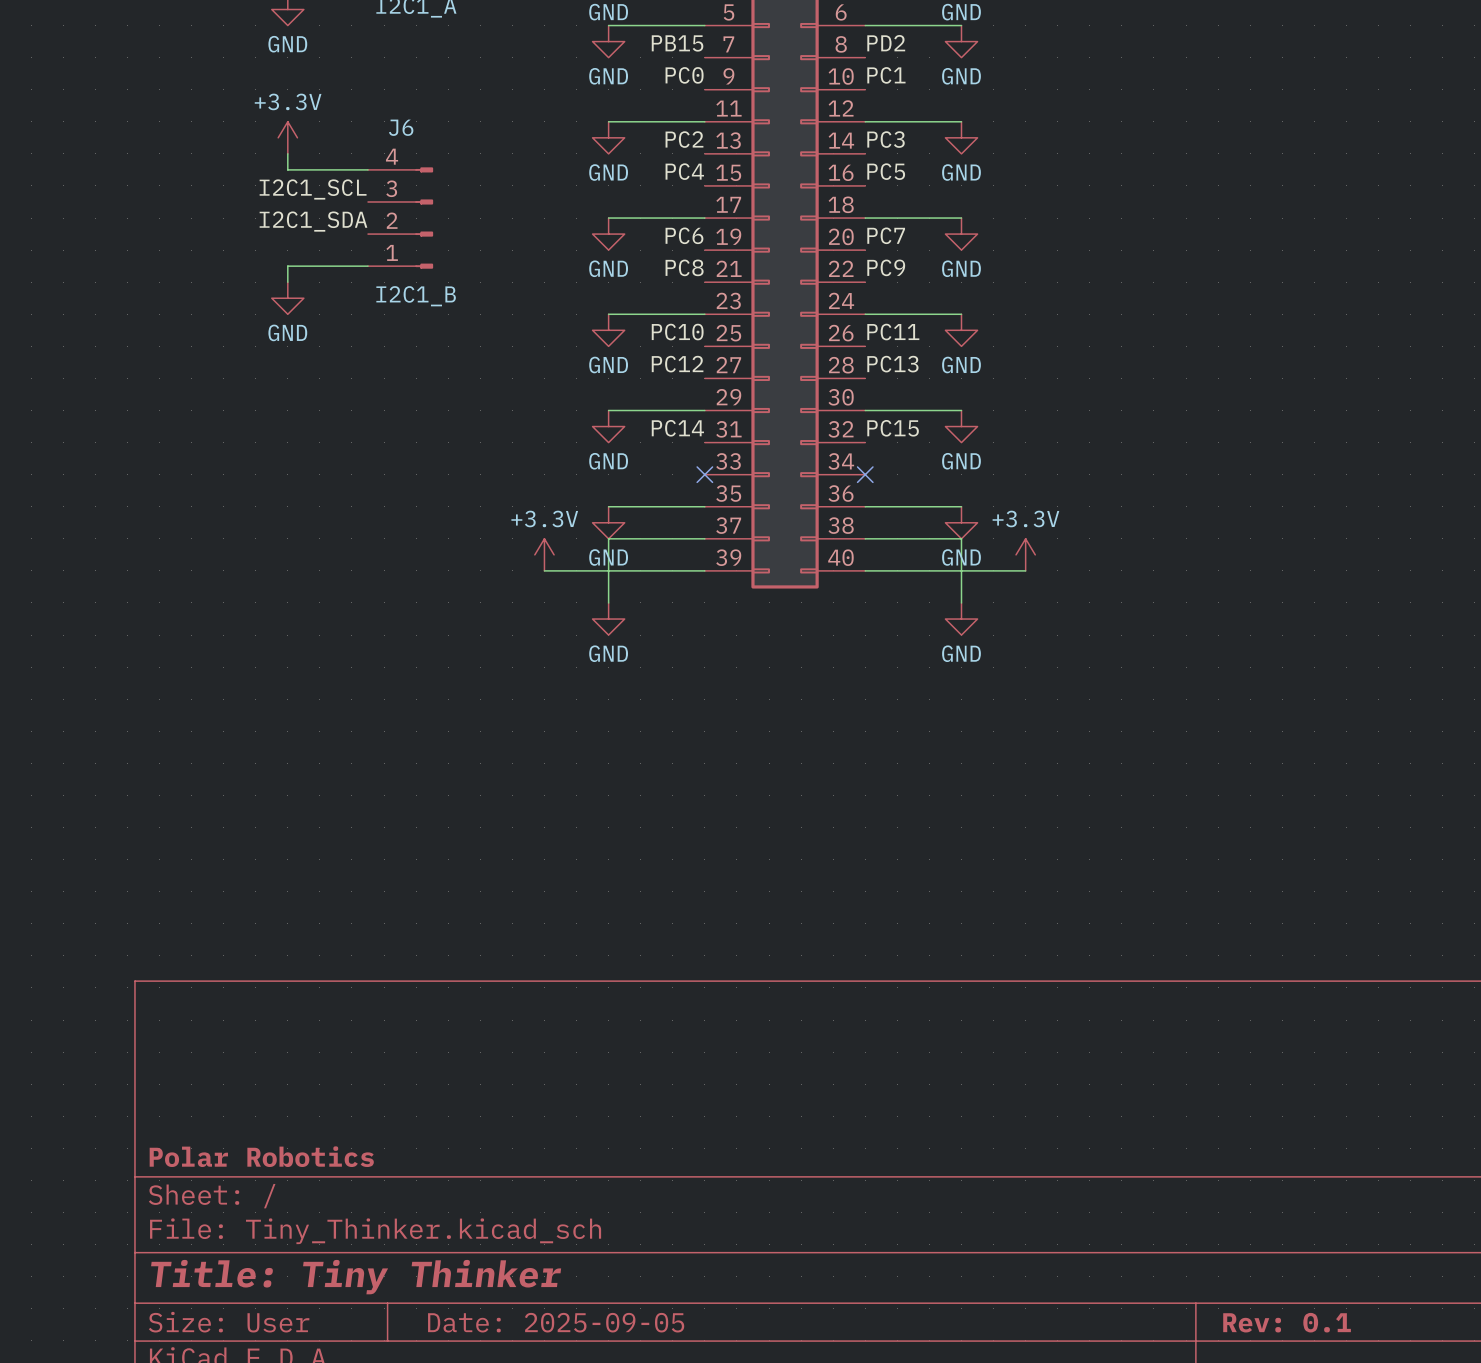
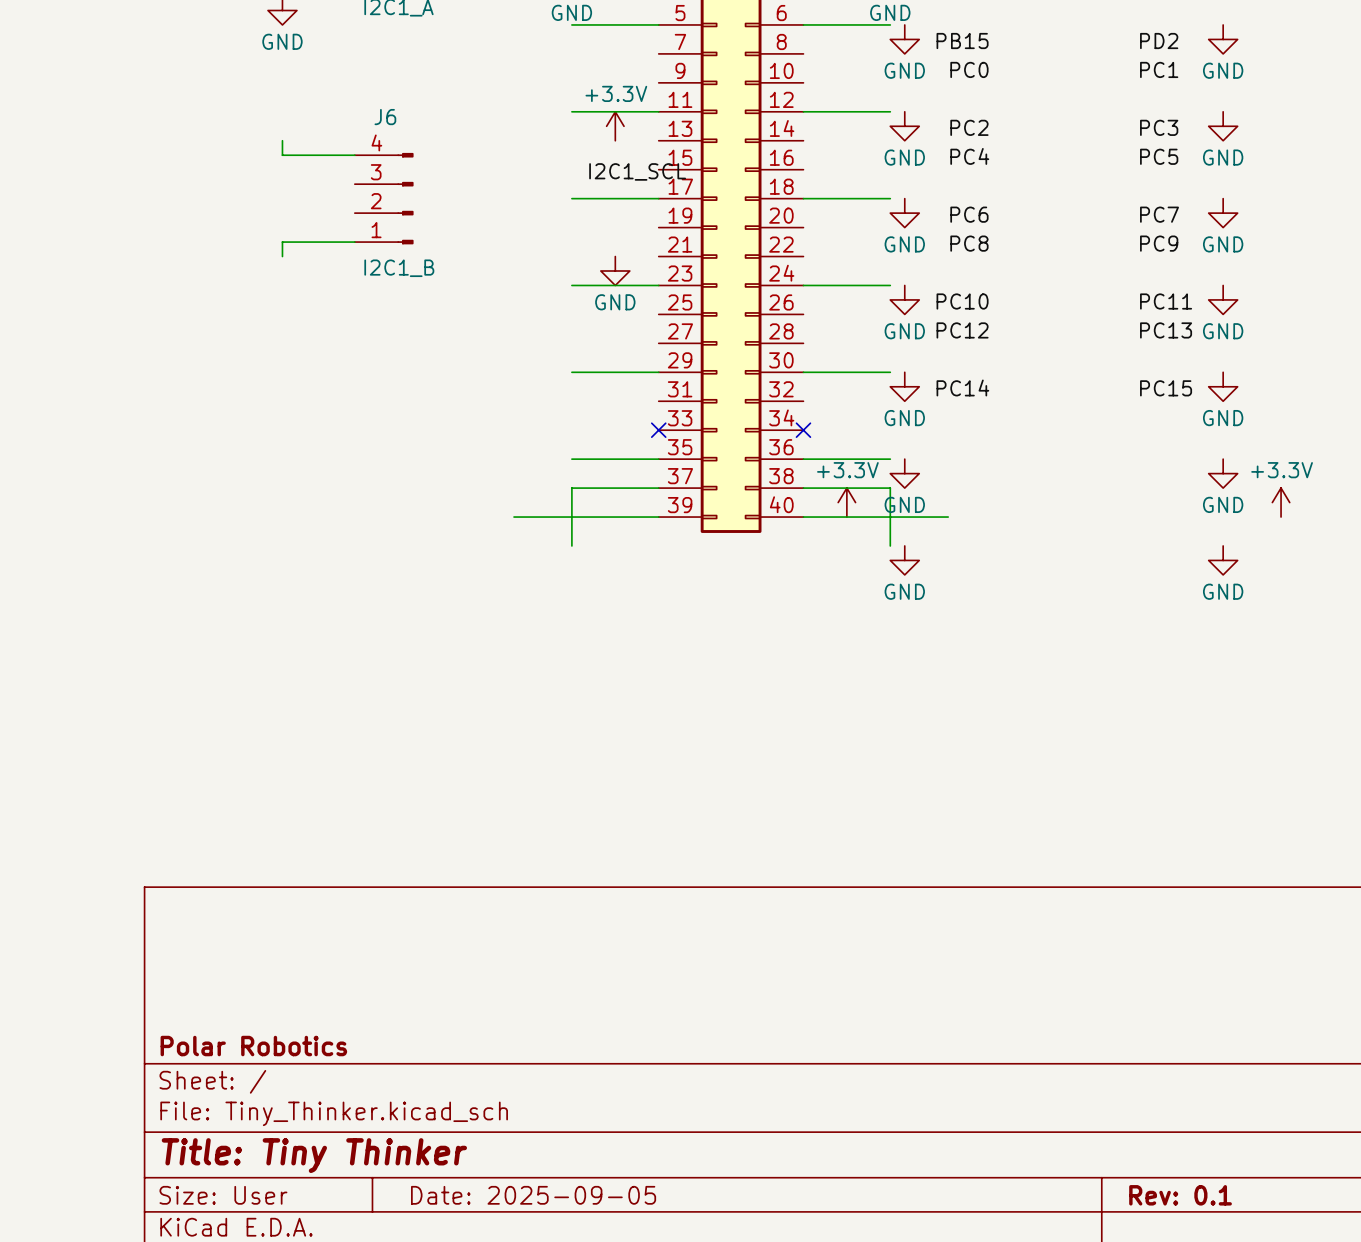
power symbol: GND (608, 41) -> none
power symbol position: GND (961, 41) -> GND (904, 39)
power symbol: none -> GND (1223, 39)
label: PB15 (677, 43) -> none
label: PD2 (886, 43) -> none
label: none -> PB15 (962, 41)
label: none -> PD2 (1159, 41)
label: PC0 (684, 75) -> none
label: PC1 (886, 75) -> none
label: none -> PC0 (969, 69)
label: none -> PC1 (1159, 69)
power symbol: +3.3V (287, 137) -> none
power symbol: GND (608, 137) -> none
power symbol: none -> +3.3V (615, 126)
power symbol position: GND (961, 137) -> GND (904, 126)
power symbol: none -> GND (1223, 126)
label: PC2 (684, 139) -> none
label: PC3 (886, 139) -> none
label: none -> PC2 (969, 127)
label: none -> PC3 (1159, 127)
label: PC4 (684, 171) -> none
label: PC5 (886, 171) -> none
label: none -> PC4 (969, 156)
label: none -> PC5 (1159, 156)
label: I2C1_SCL (313, 189) -> none
label: none -> I2C1_SCL (637, 171)
label: I2C1_SDA (313, 221) -> none
power symbol: GND (608, 234) -> none
power symbol position: GND (961, 234) -> GND (904, 213)
power symbol: none -> GND (1223, 213)
label: PC6 (684, 235) -> none
label: PC7 (886, 235) -> none
label: none -> PC6 (969, 214)
label: none -> PC7 (1159, 214)
label: PC8 (684, 267) -> none
label: PC9 (886, 267) -> none
label: none -> PC8 (969, 243)
label: none -> PC9 (1159, 243)
power symbol: GND (287, 298) -> none
power symbol: none -> GND (615, 271)
power symbol: GND (608, 330) -> none
power symbol position: GND (961, 330) -> GND (904, 299)
power symbol: none -> GND (1223, 299)
label: PC10 (677, 332) -> none
label: PC11 (893, 332) -> none
label: none -> PC10 (962, 301)
label: none -> PC11 (1166, 301)
label: PC12 (677, 364) -> none
label: PC13 (892, 364) -> none
label: none -> PC12 (962, 330)
label: none -> PC13 (1166, 330)
power symbol: GND (608, 426) -> none
power symbol position: GND (961, 426) -> GND (904, 386)
power symbol: none -> GND (1223, 386)
label: PC14 (677, 428) -> none
label: PC15 (893, 428) -> none
label: none -> PC14 (962, 387)
label: none -> PC15 (1166, 388)
power symbol: GND (608, 522) -> none
power symbol position: GND (961, 522) -> GND (904, 473)
power symbol: none -> GND (1223, 473)
power symbol: +3.3V (544, 554) -> none
power symbol position: +3.3V (1025, 554) -> +3.3V (846, 502)
power symbol: none -> +3.3V (1281, 502)
power symbol: GND (608, 619) -> none
power symbol position: GND (961, 619) -> GND (904, 560)
power symbol: none -> GND (1223, 560)

